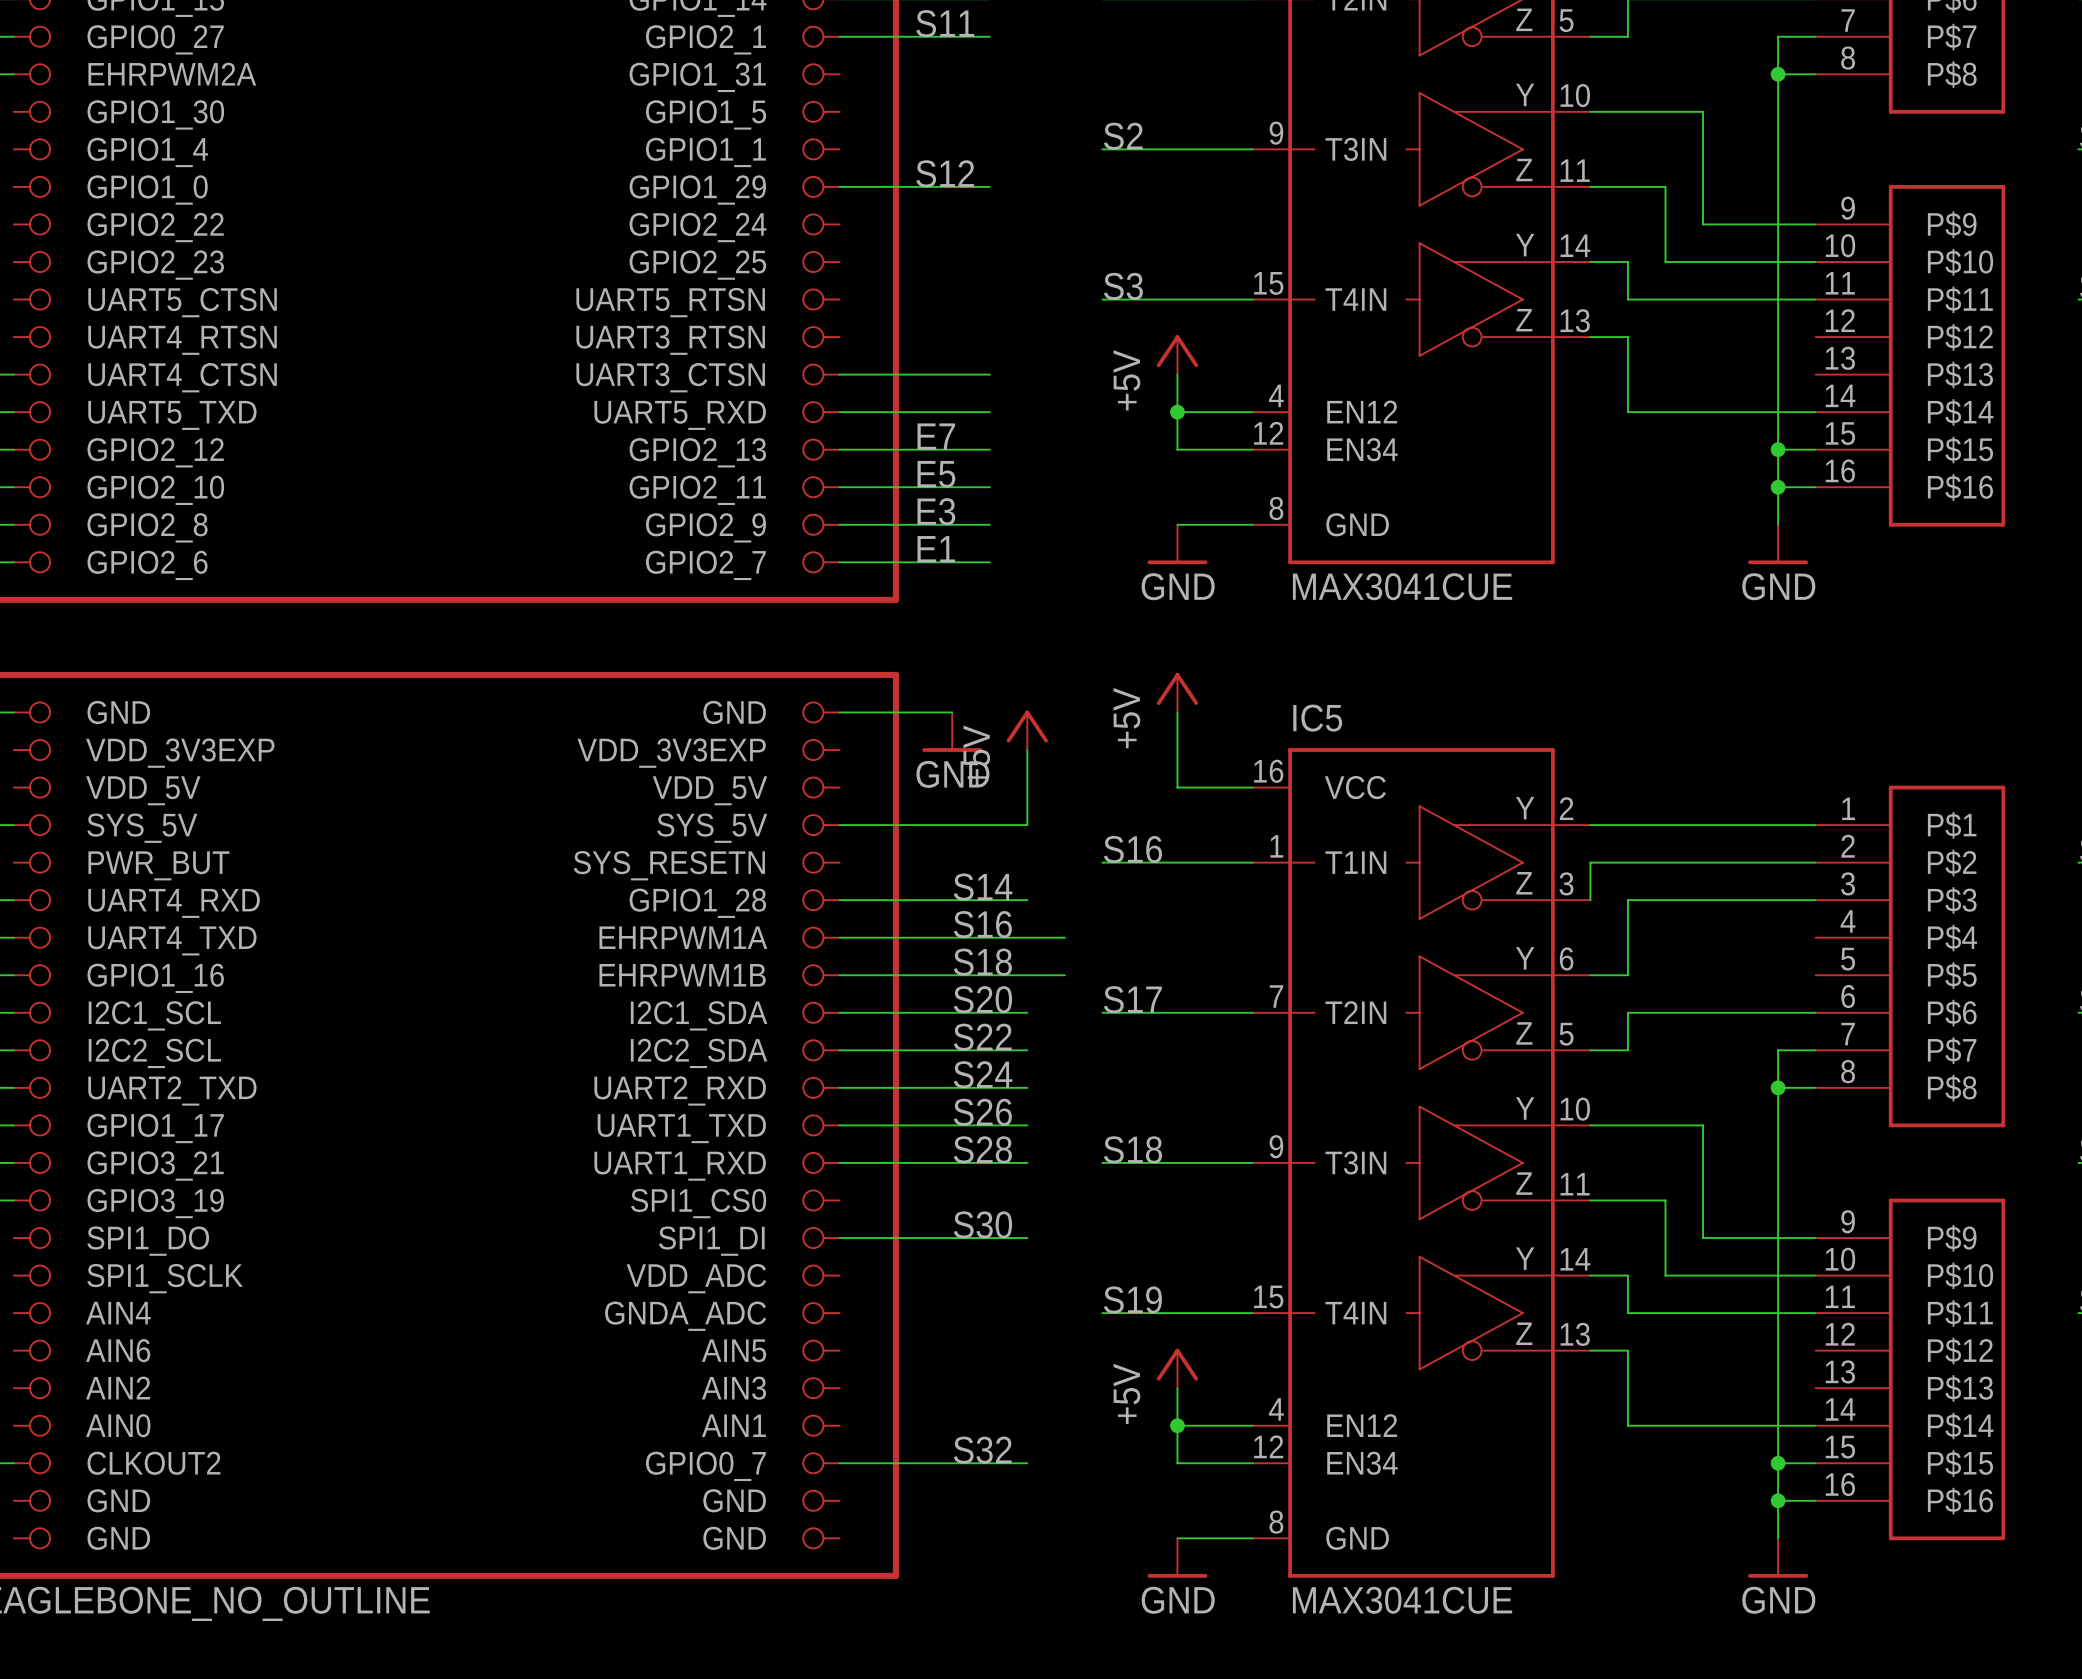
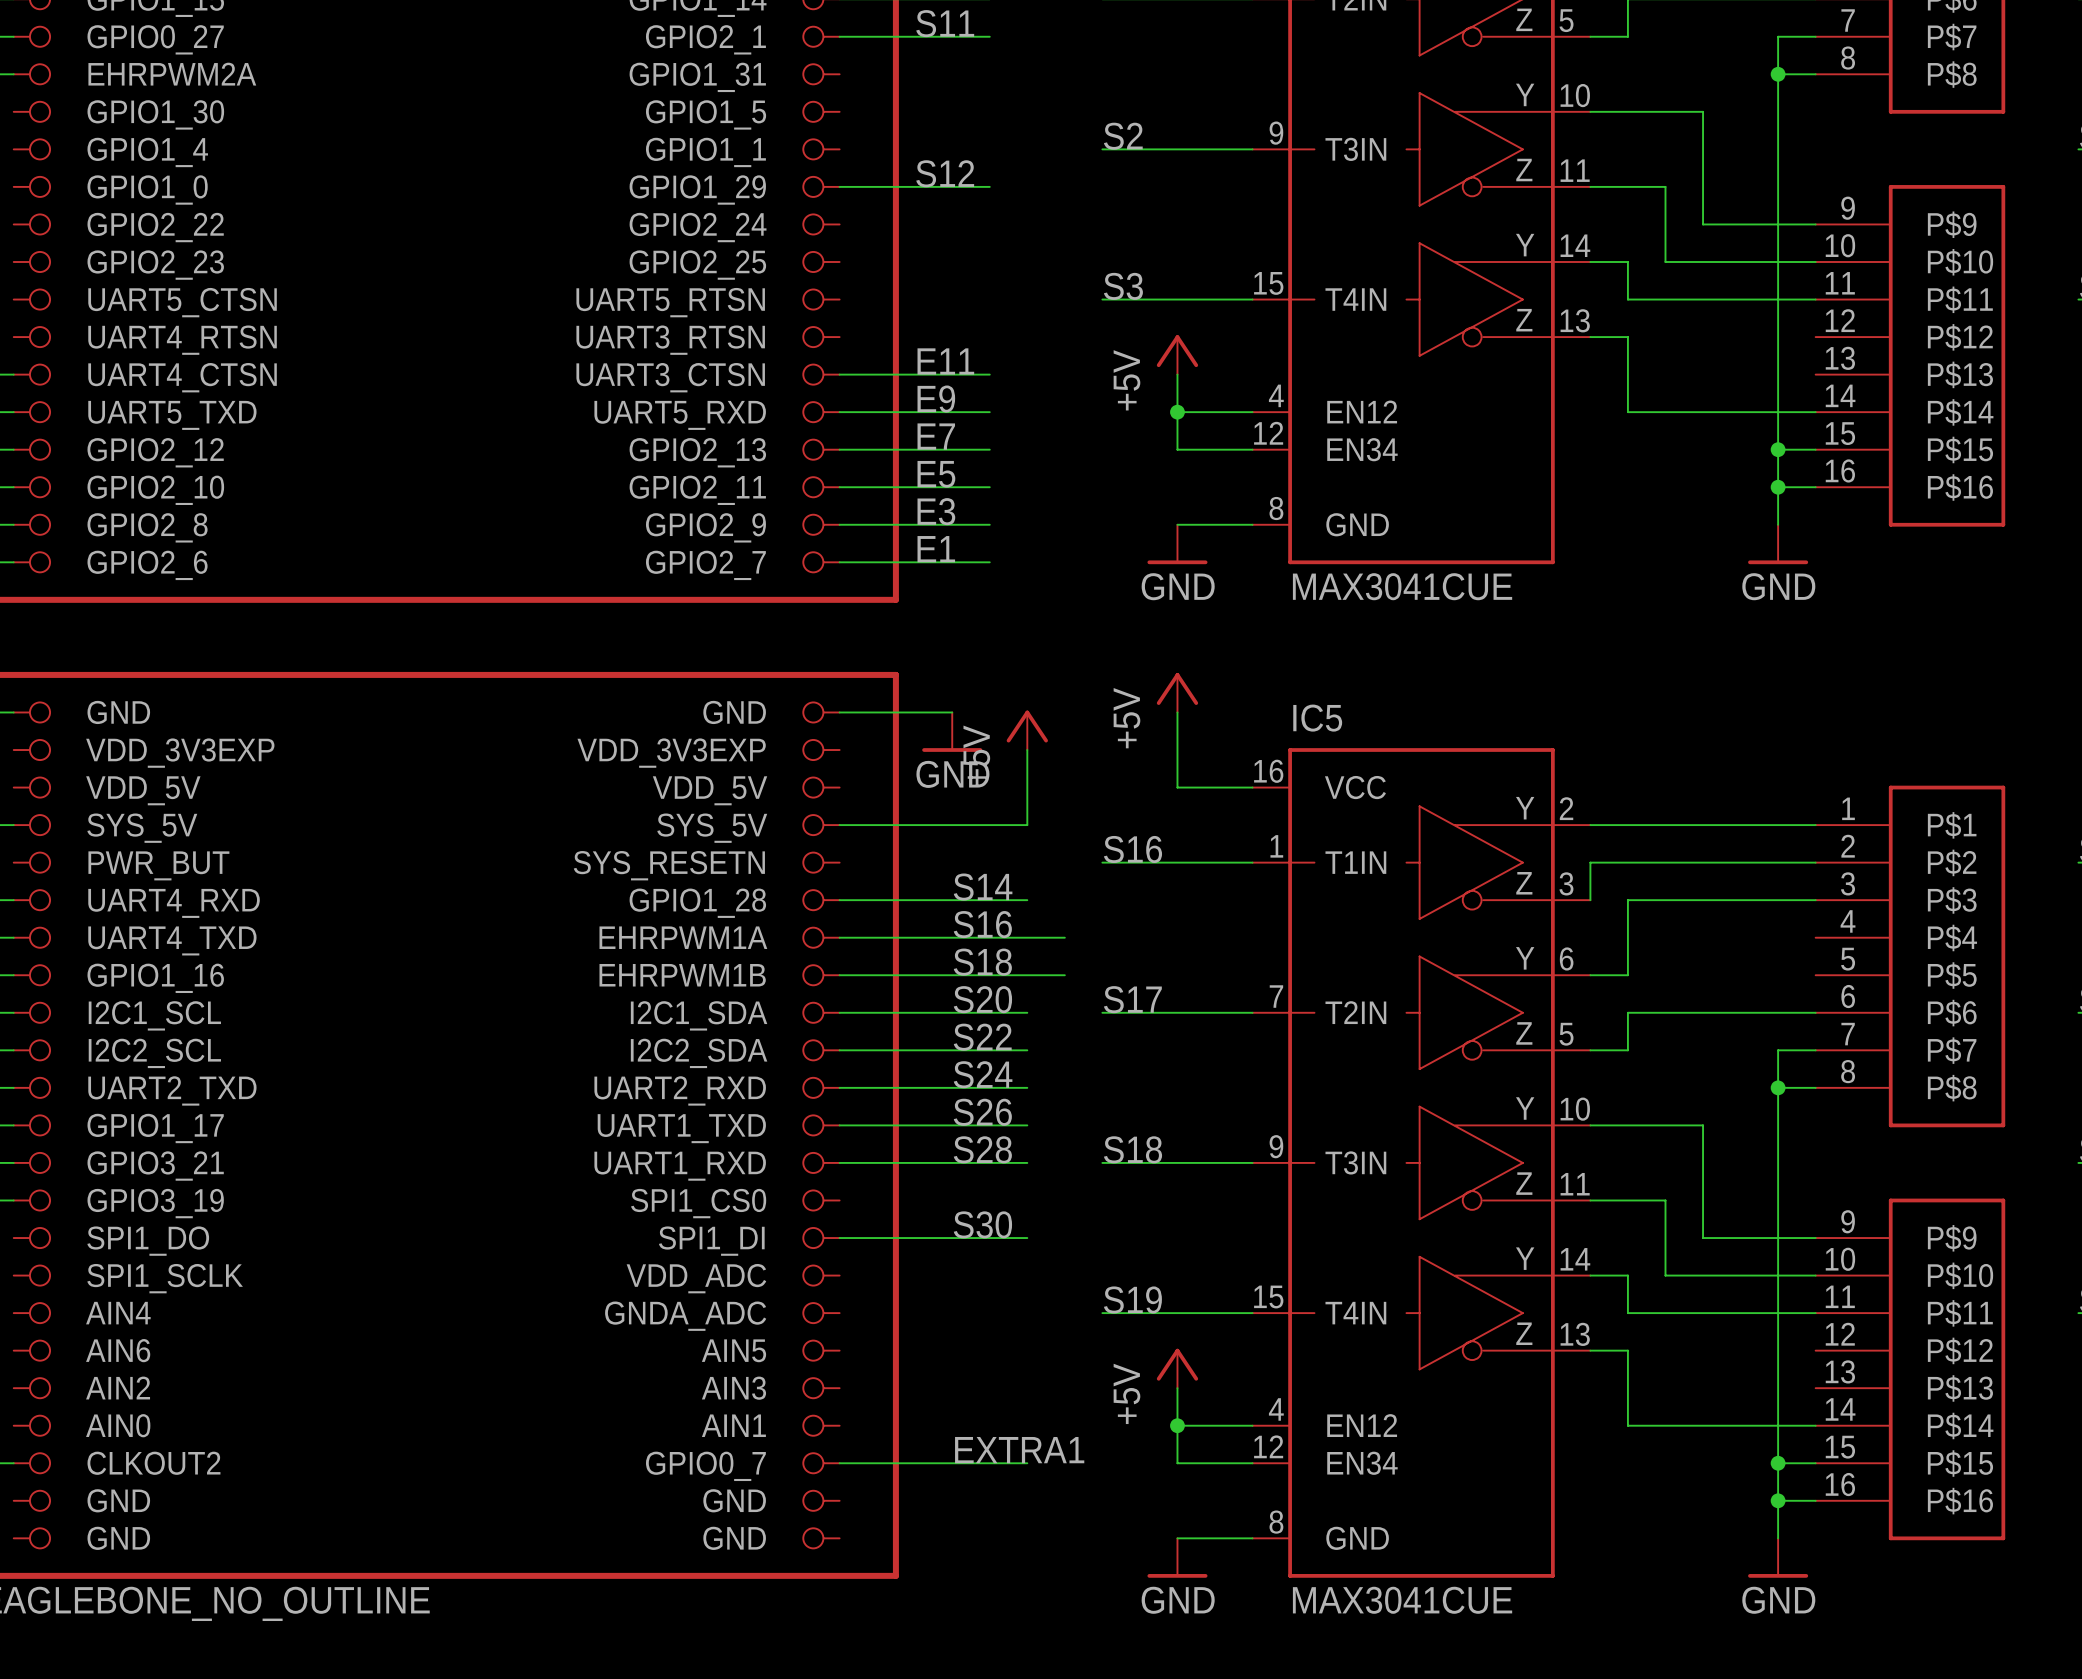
label: none -> E11 (945, 361)
label: none -> E9 (936, 399)
label: S32 (982, 1450) -> EXTRA1 (1019, 1450)

